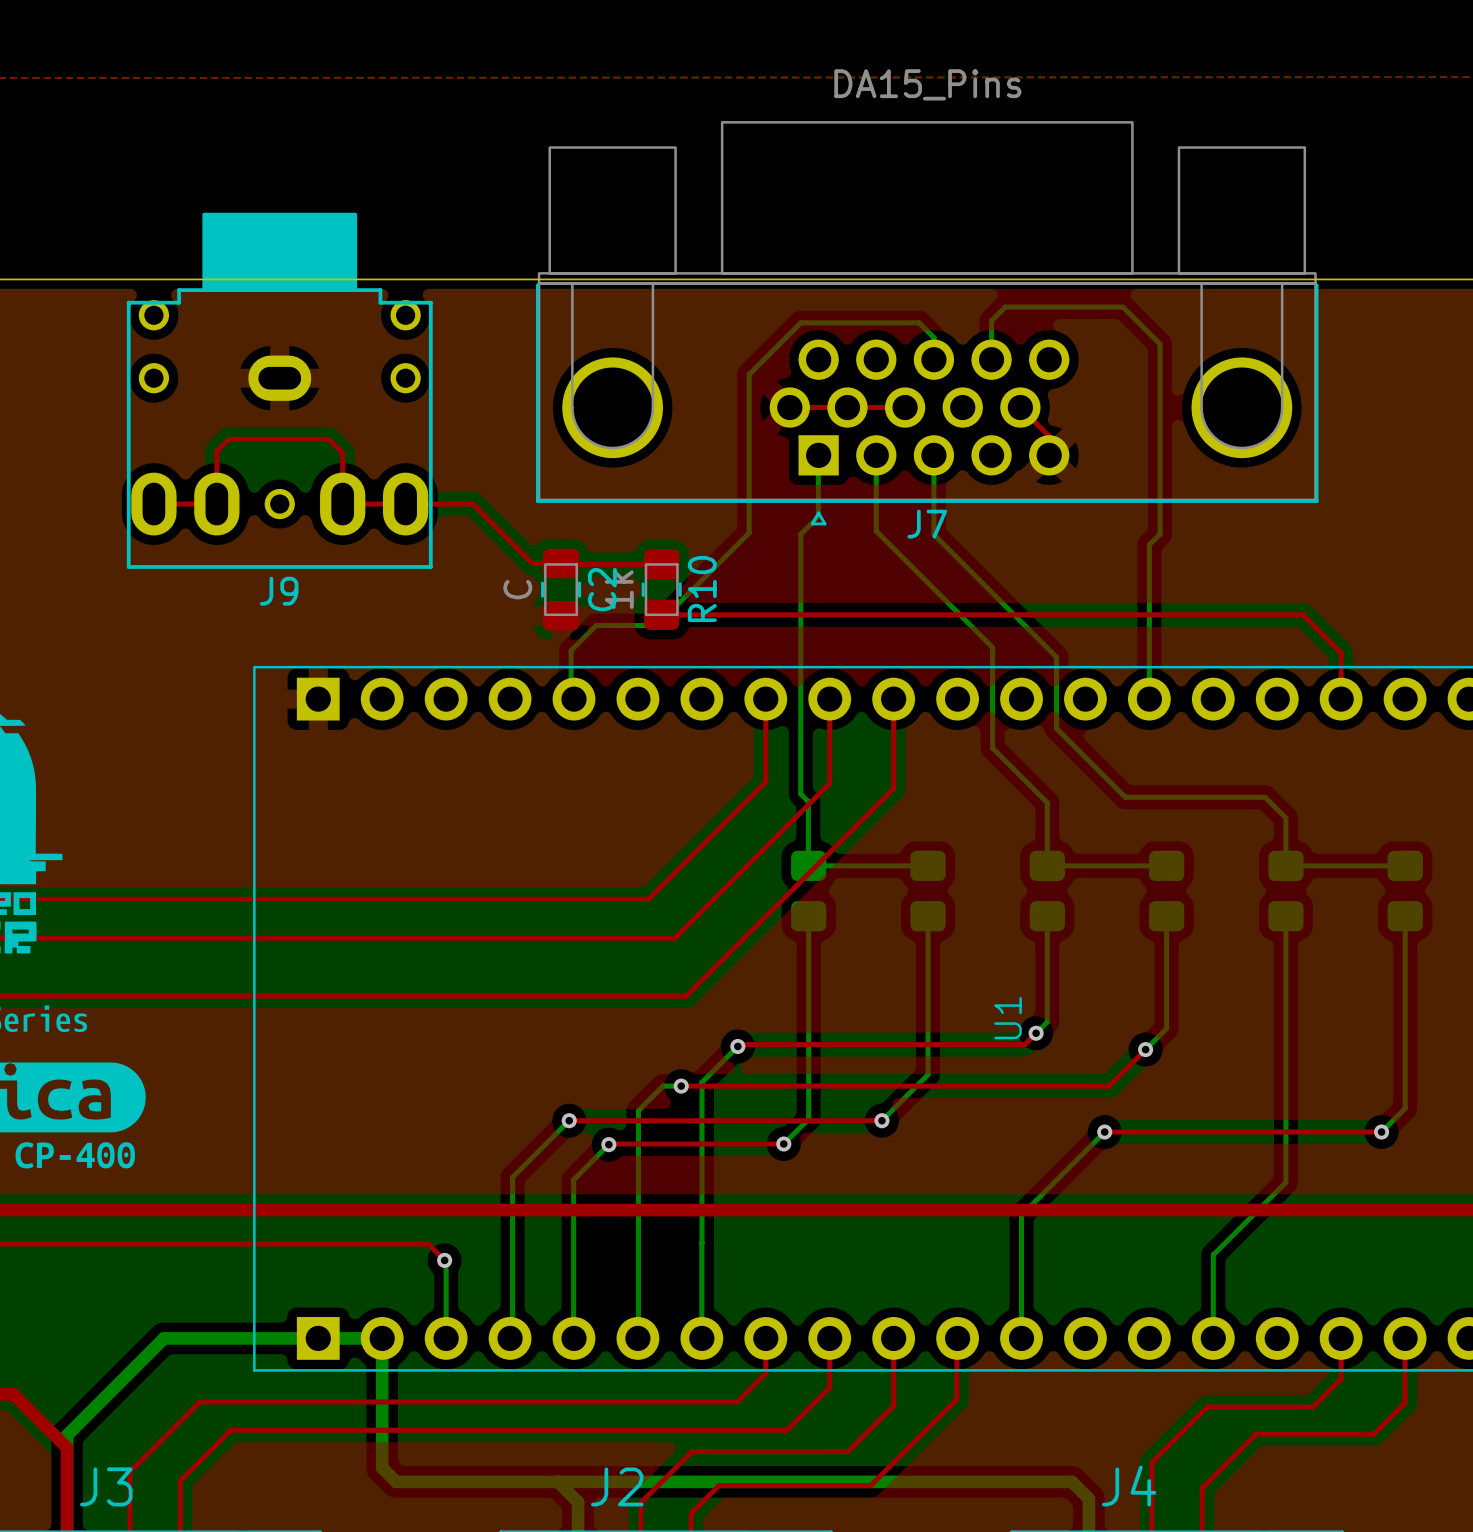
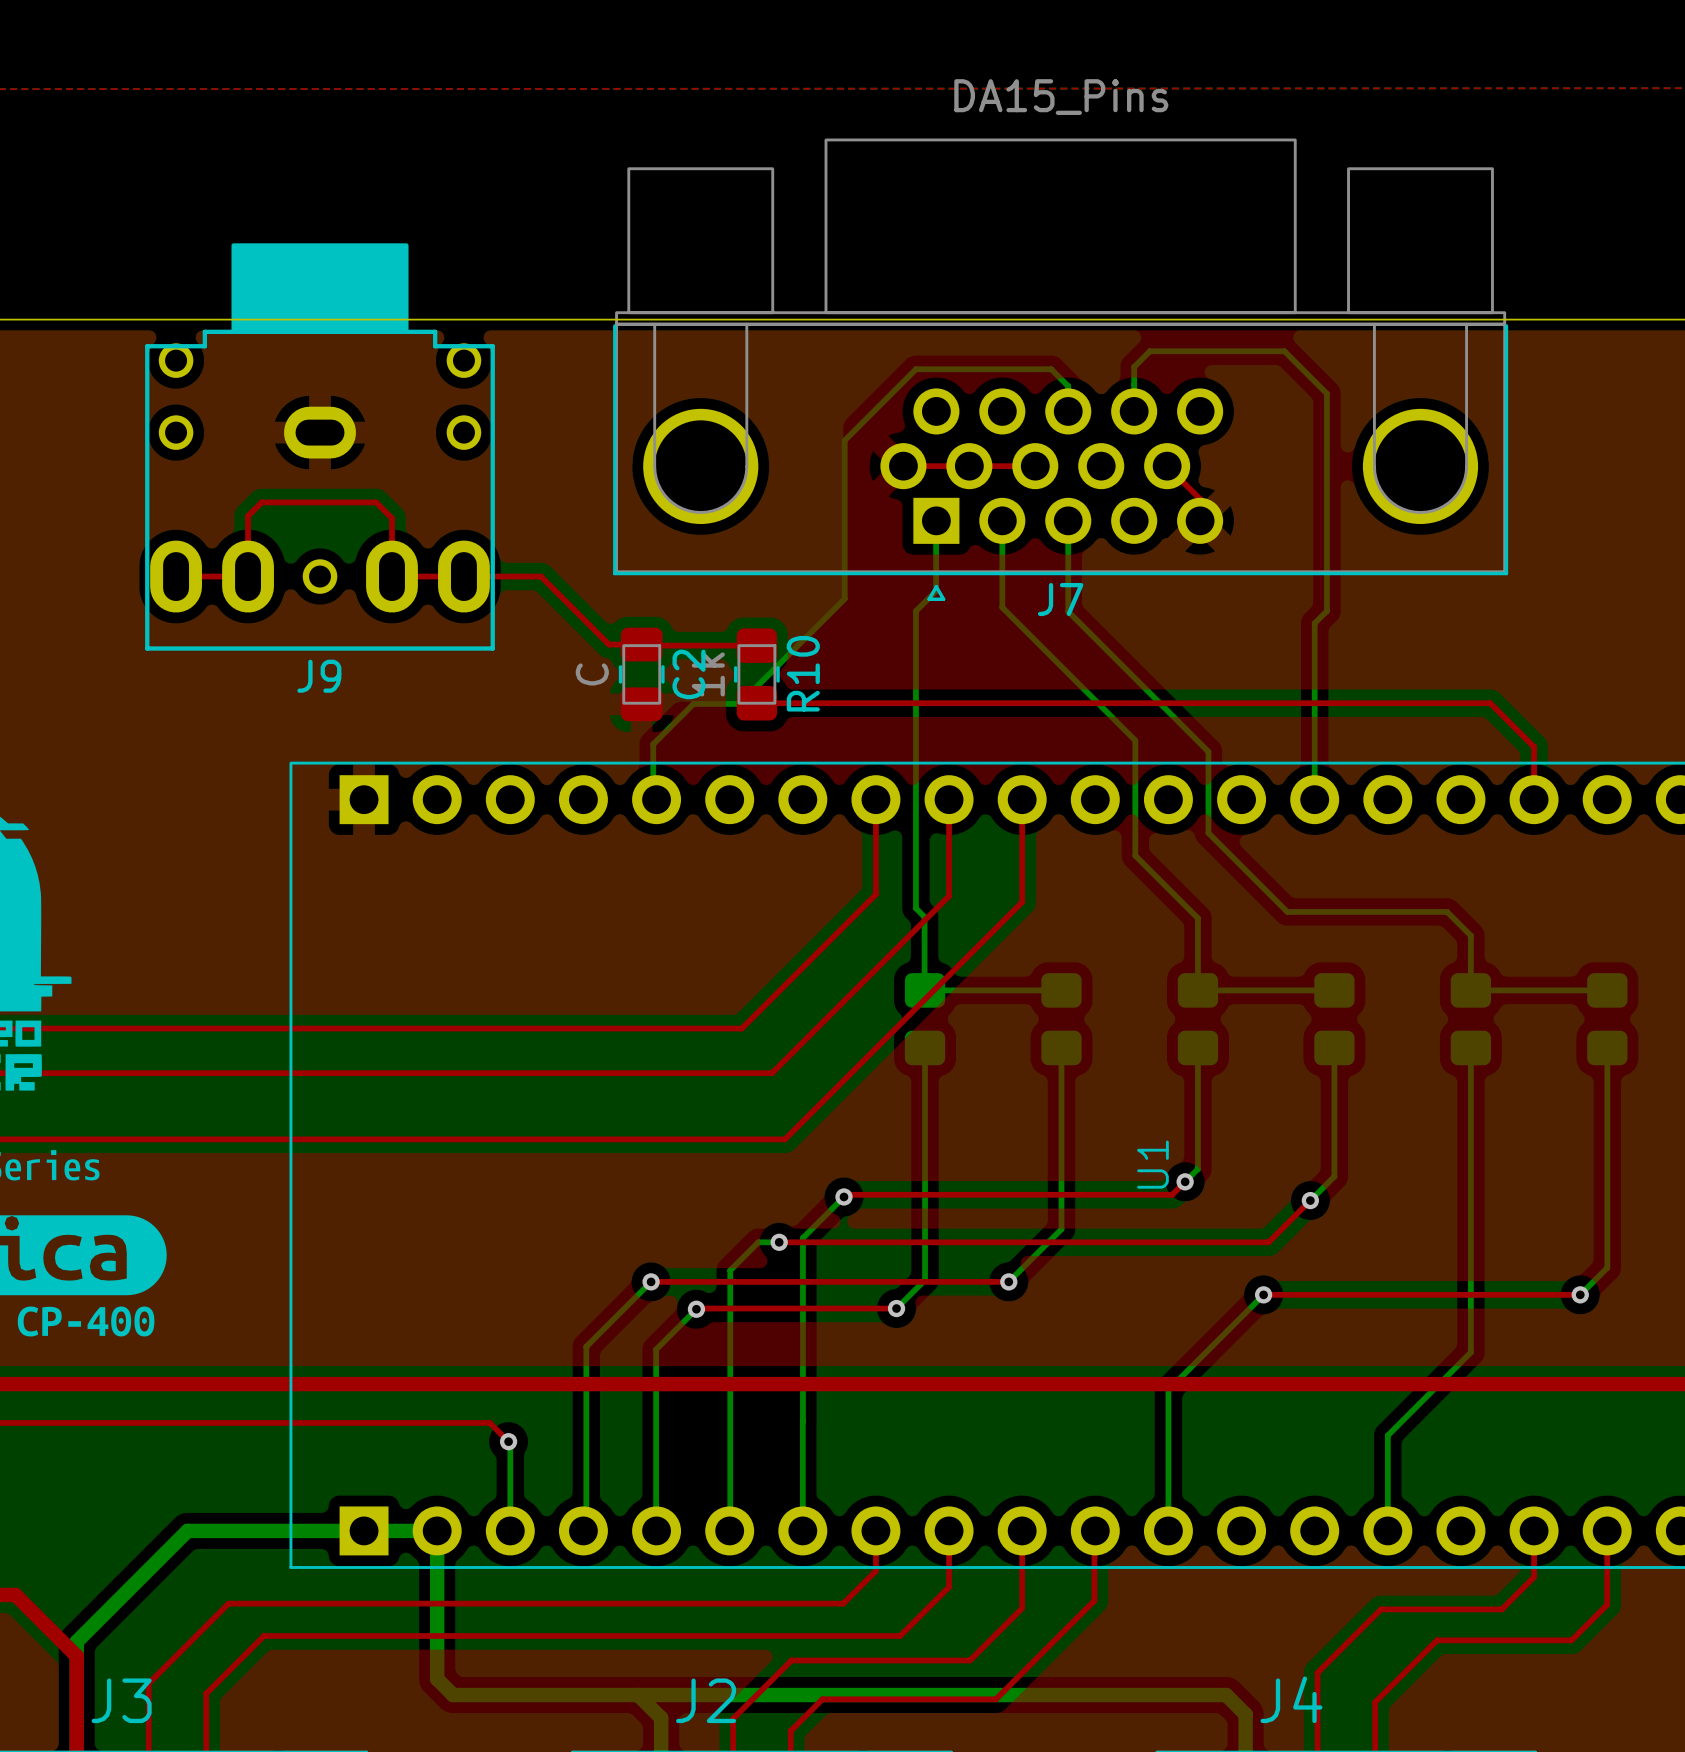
bottom track: (749, 374) (749, 533) (656, 625) (596, 625) -> (856, 428) (844, 440) (844, 598) (739, 703) (693, 703) (682, 715)

